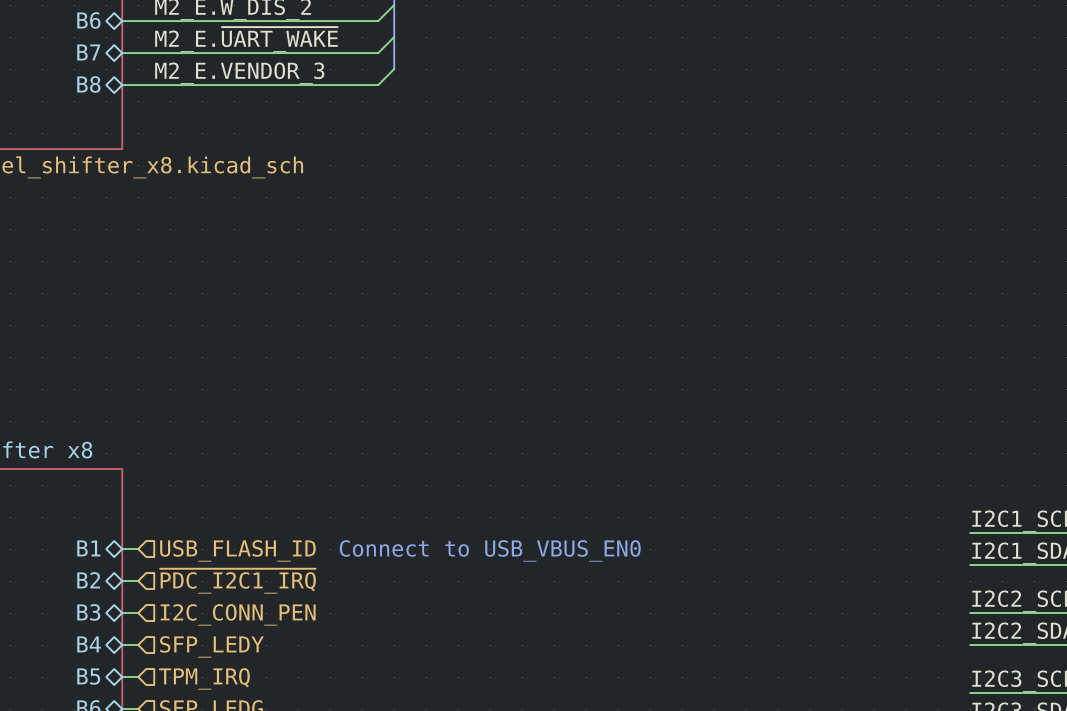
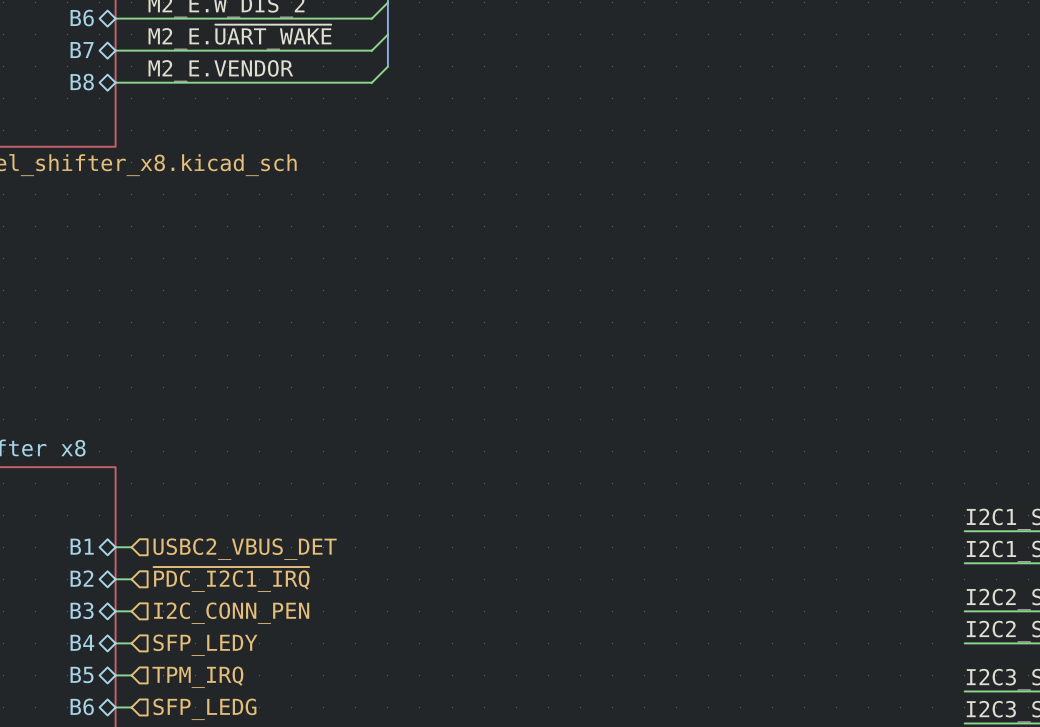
label: M2_E.VENDOR_3 (239, 73) -> M2_E.VENDOR (220, 70)
hierarchical label: USB_FLASH_ID (237, 550) -> USBC2_VBUS_DET (245, 549)
text: Connect to USB_VBUS_EN0 (490, 550) -> none

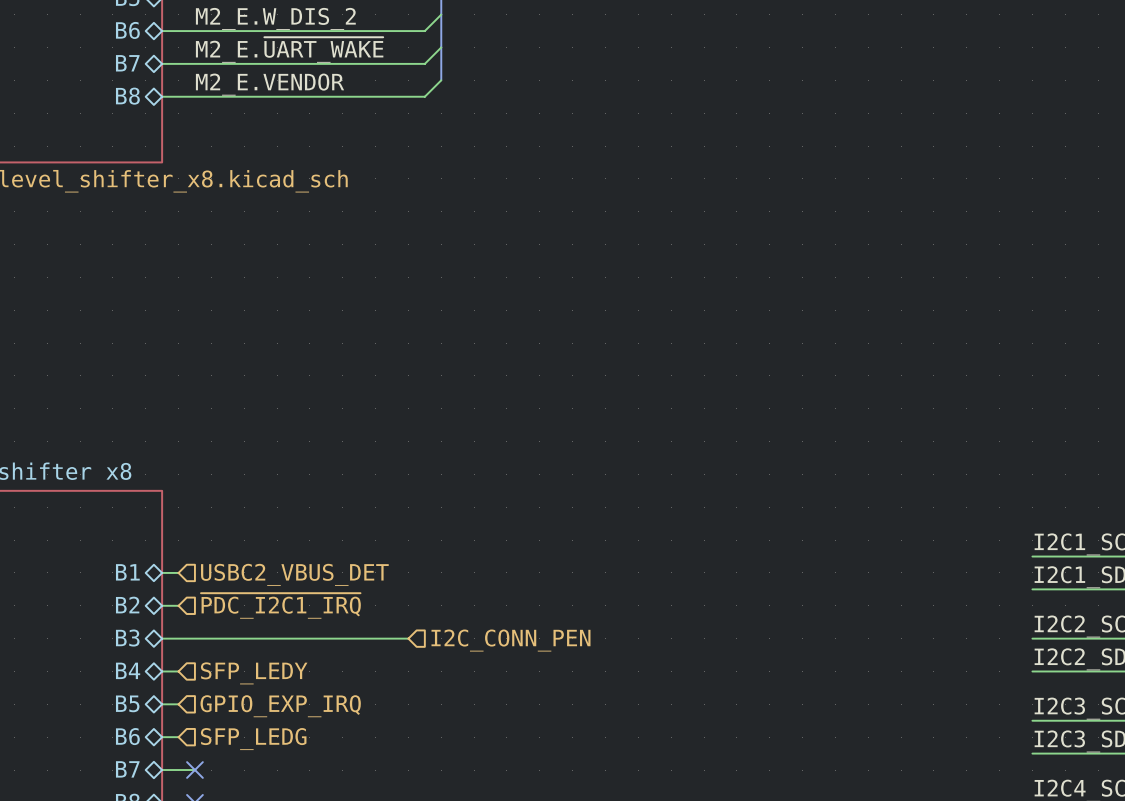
wire: none -> (178, 638) (408, 638)
hierarchical label position: I2C_CONN_PEN (231, 613) -> I2C_CONN_PEN (510, 640)
hierarchical label: TPM_IRQ (197, 677) -> GPIO_EXP_IRQ (280, 706)

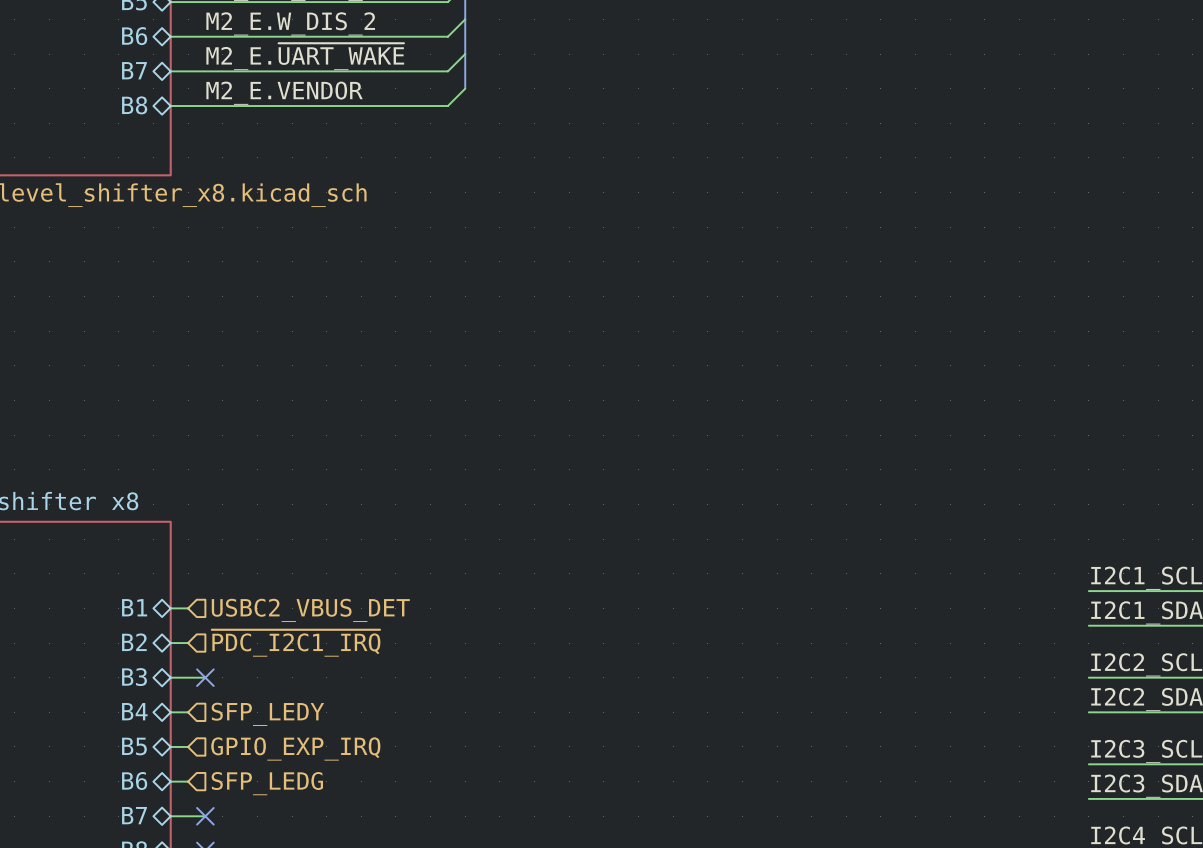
wire: (194, 638) (408, 638) -> none
no-connect mark: none -> (205, 677)
hierarchical label: I2C_CONN_PEN (510, 640) -> none

